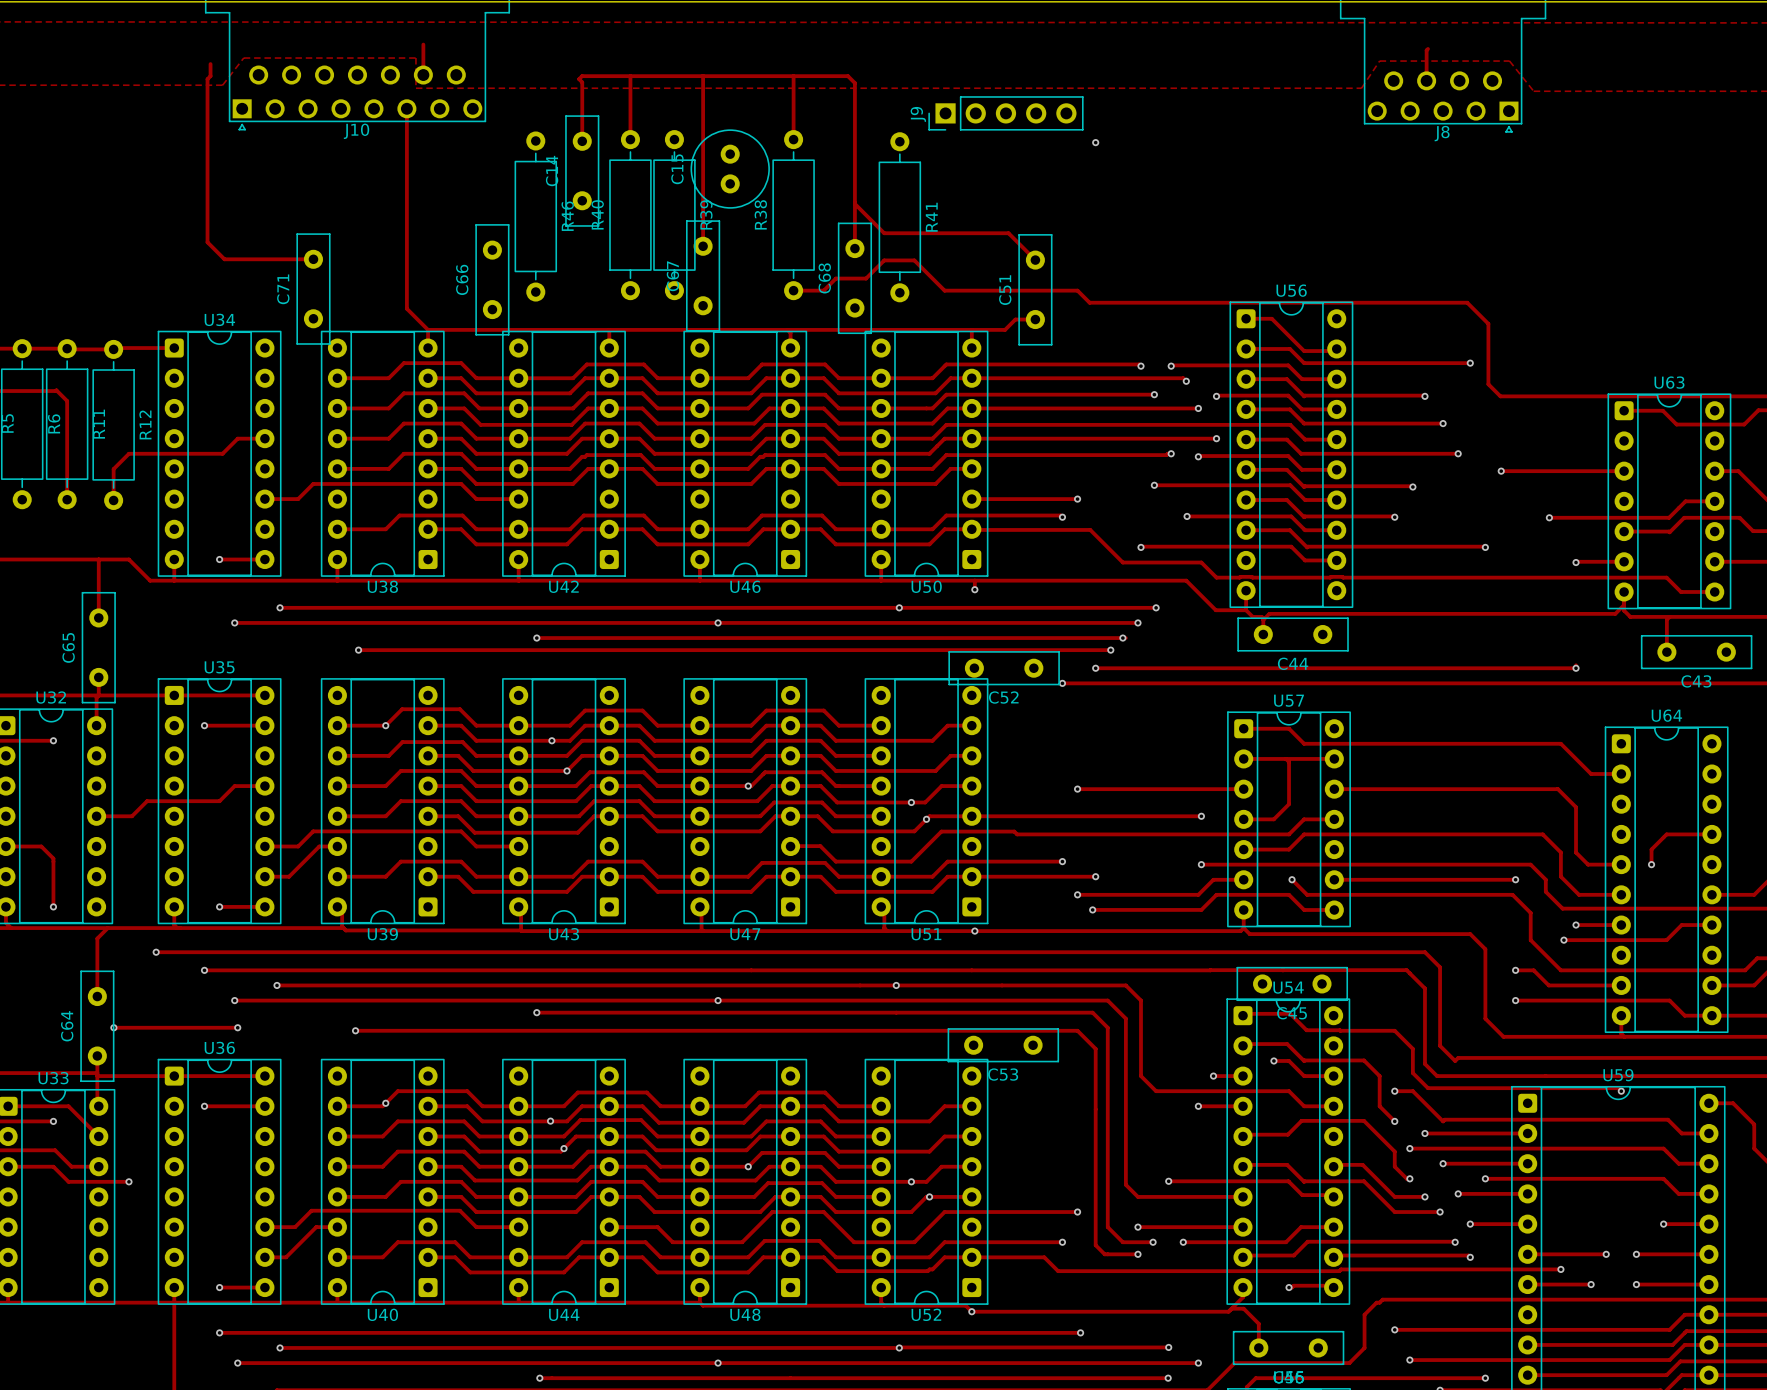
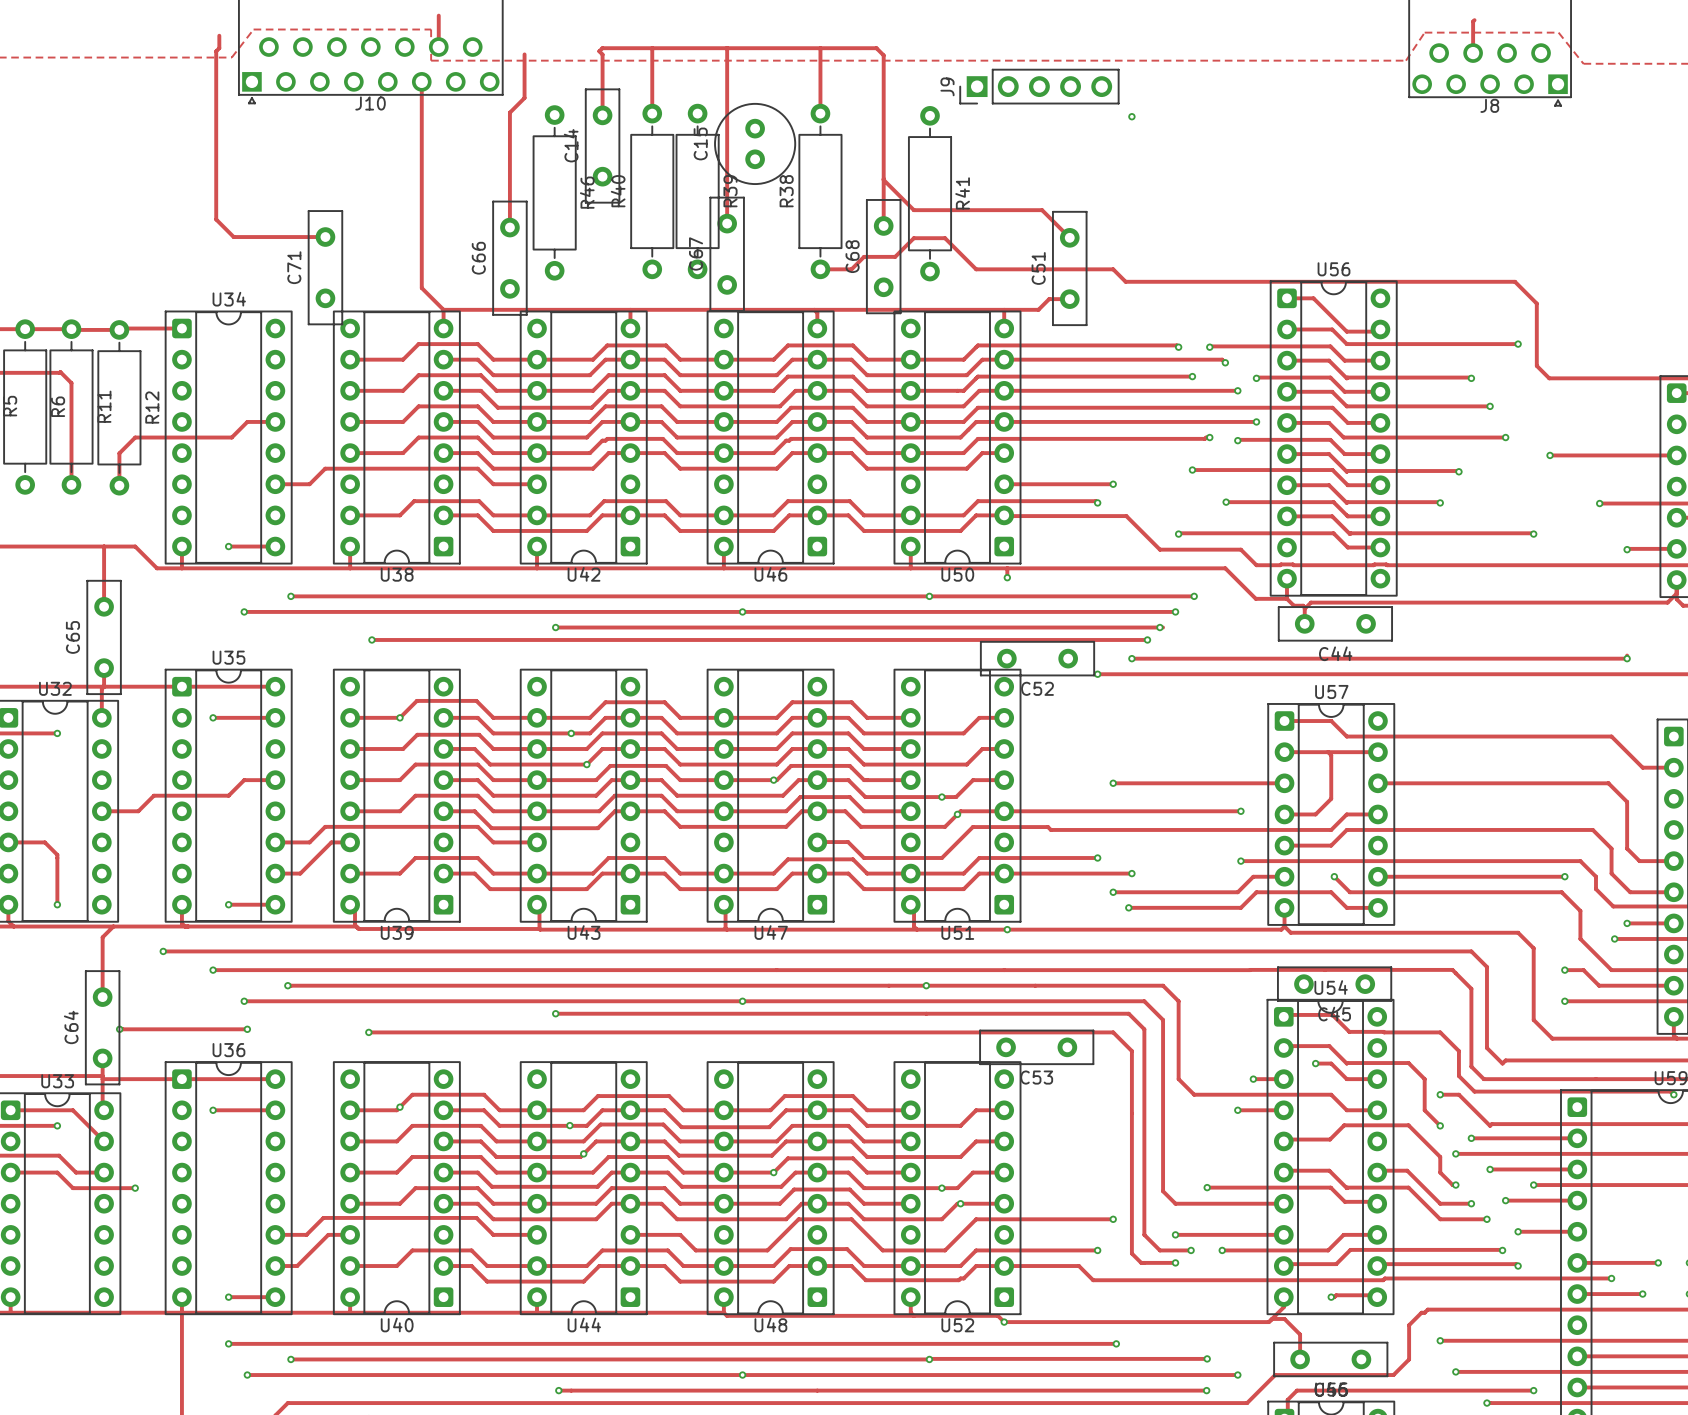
track: none -> (524, 54) (524, 98) (509, 112) (509, 227)

